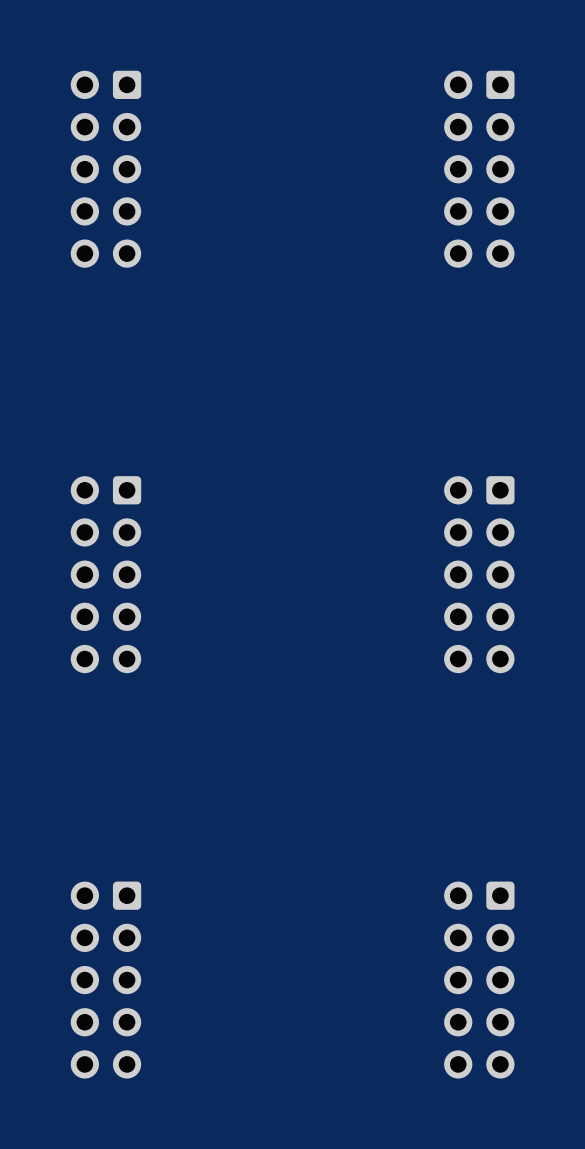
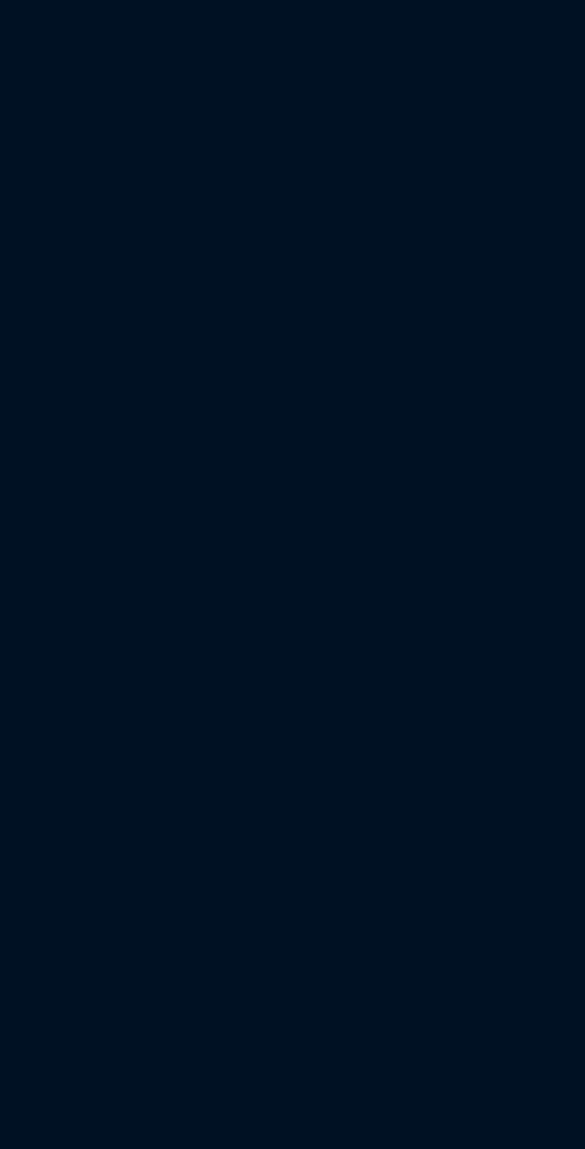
part: (105, 169) -> none
part: (479, 169) -> none
part: (105, 574) -> none
part: (479, 574) -> none
part: (105, 980) -> none
part: (479, 980) -> none

